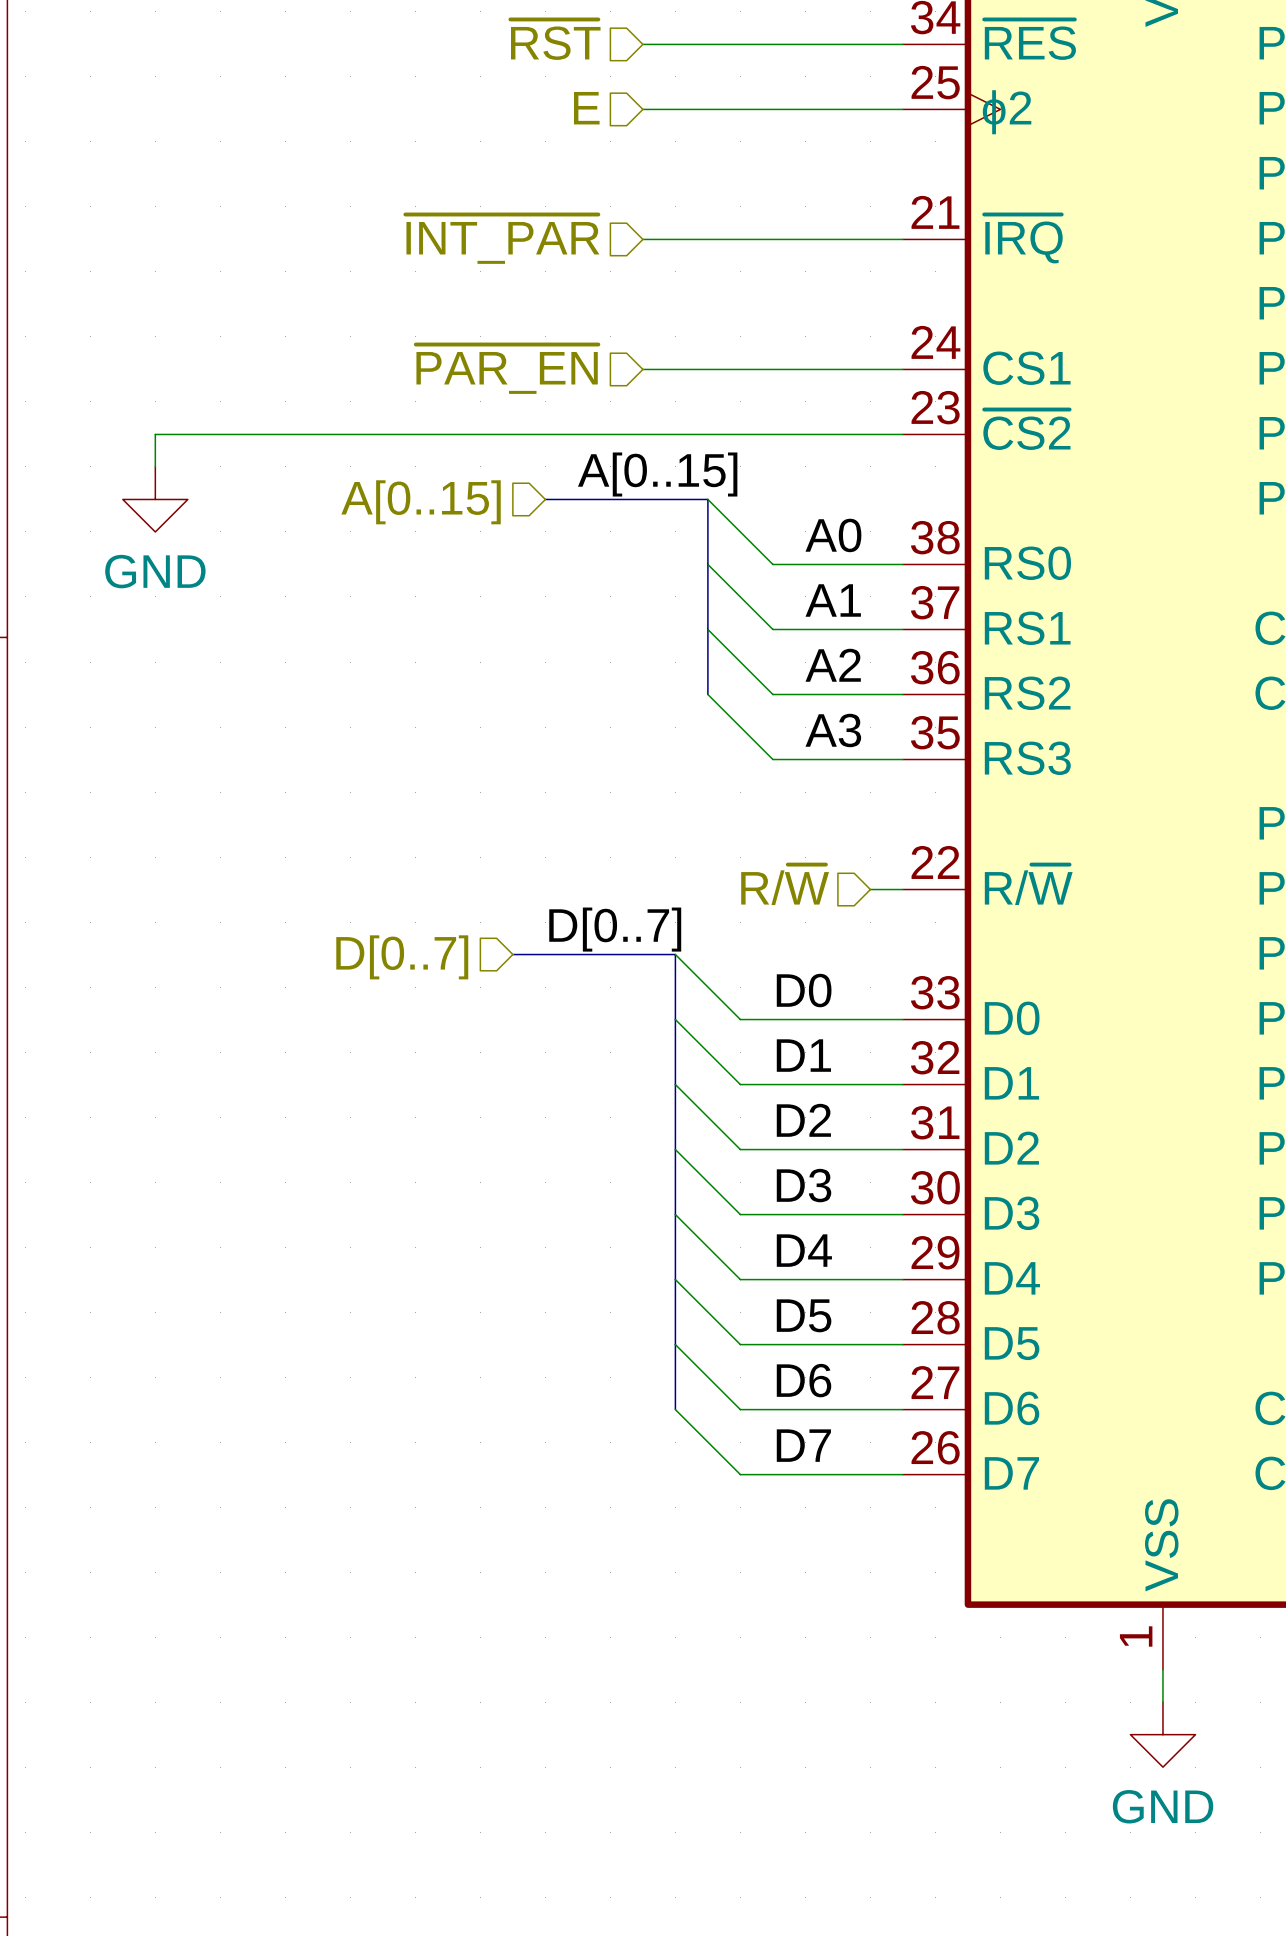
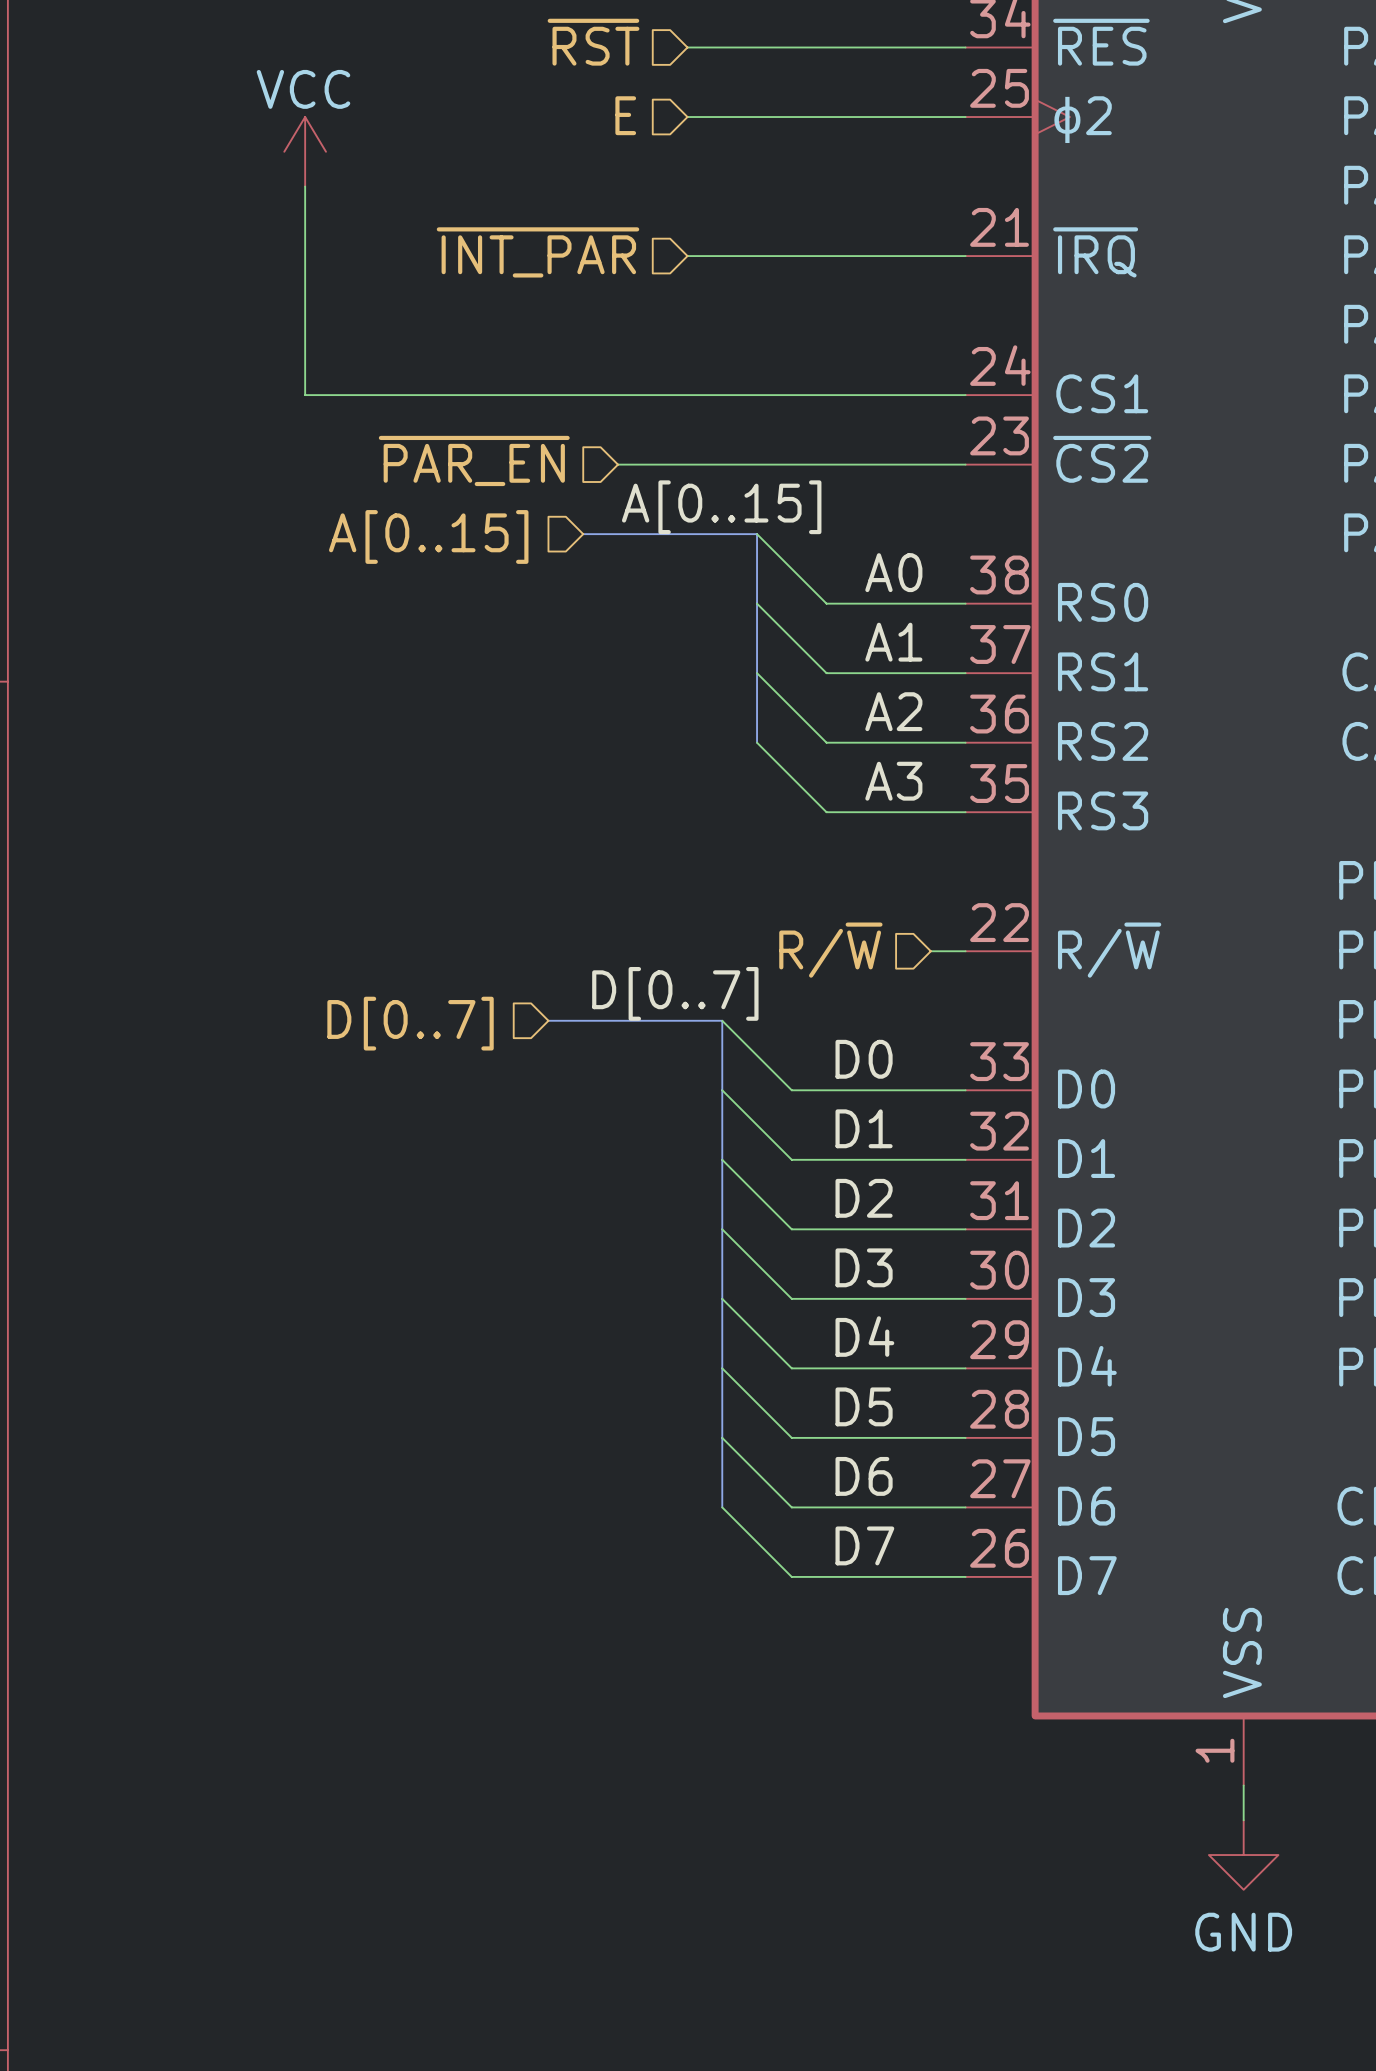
power symbol: none -> VCC (305, 151)
wire: none -> (305, 186) (305, 395) (687, 395)
hierarchical label position: ~{PAR_EN} (507, 369) -> ~{PAR_EN} (474, 460)
wire: (577, 434) (155, 434) (155, 466) -> none
power symbol: GND (155, 499) -> none

